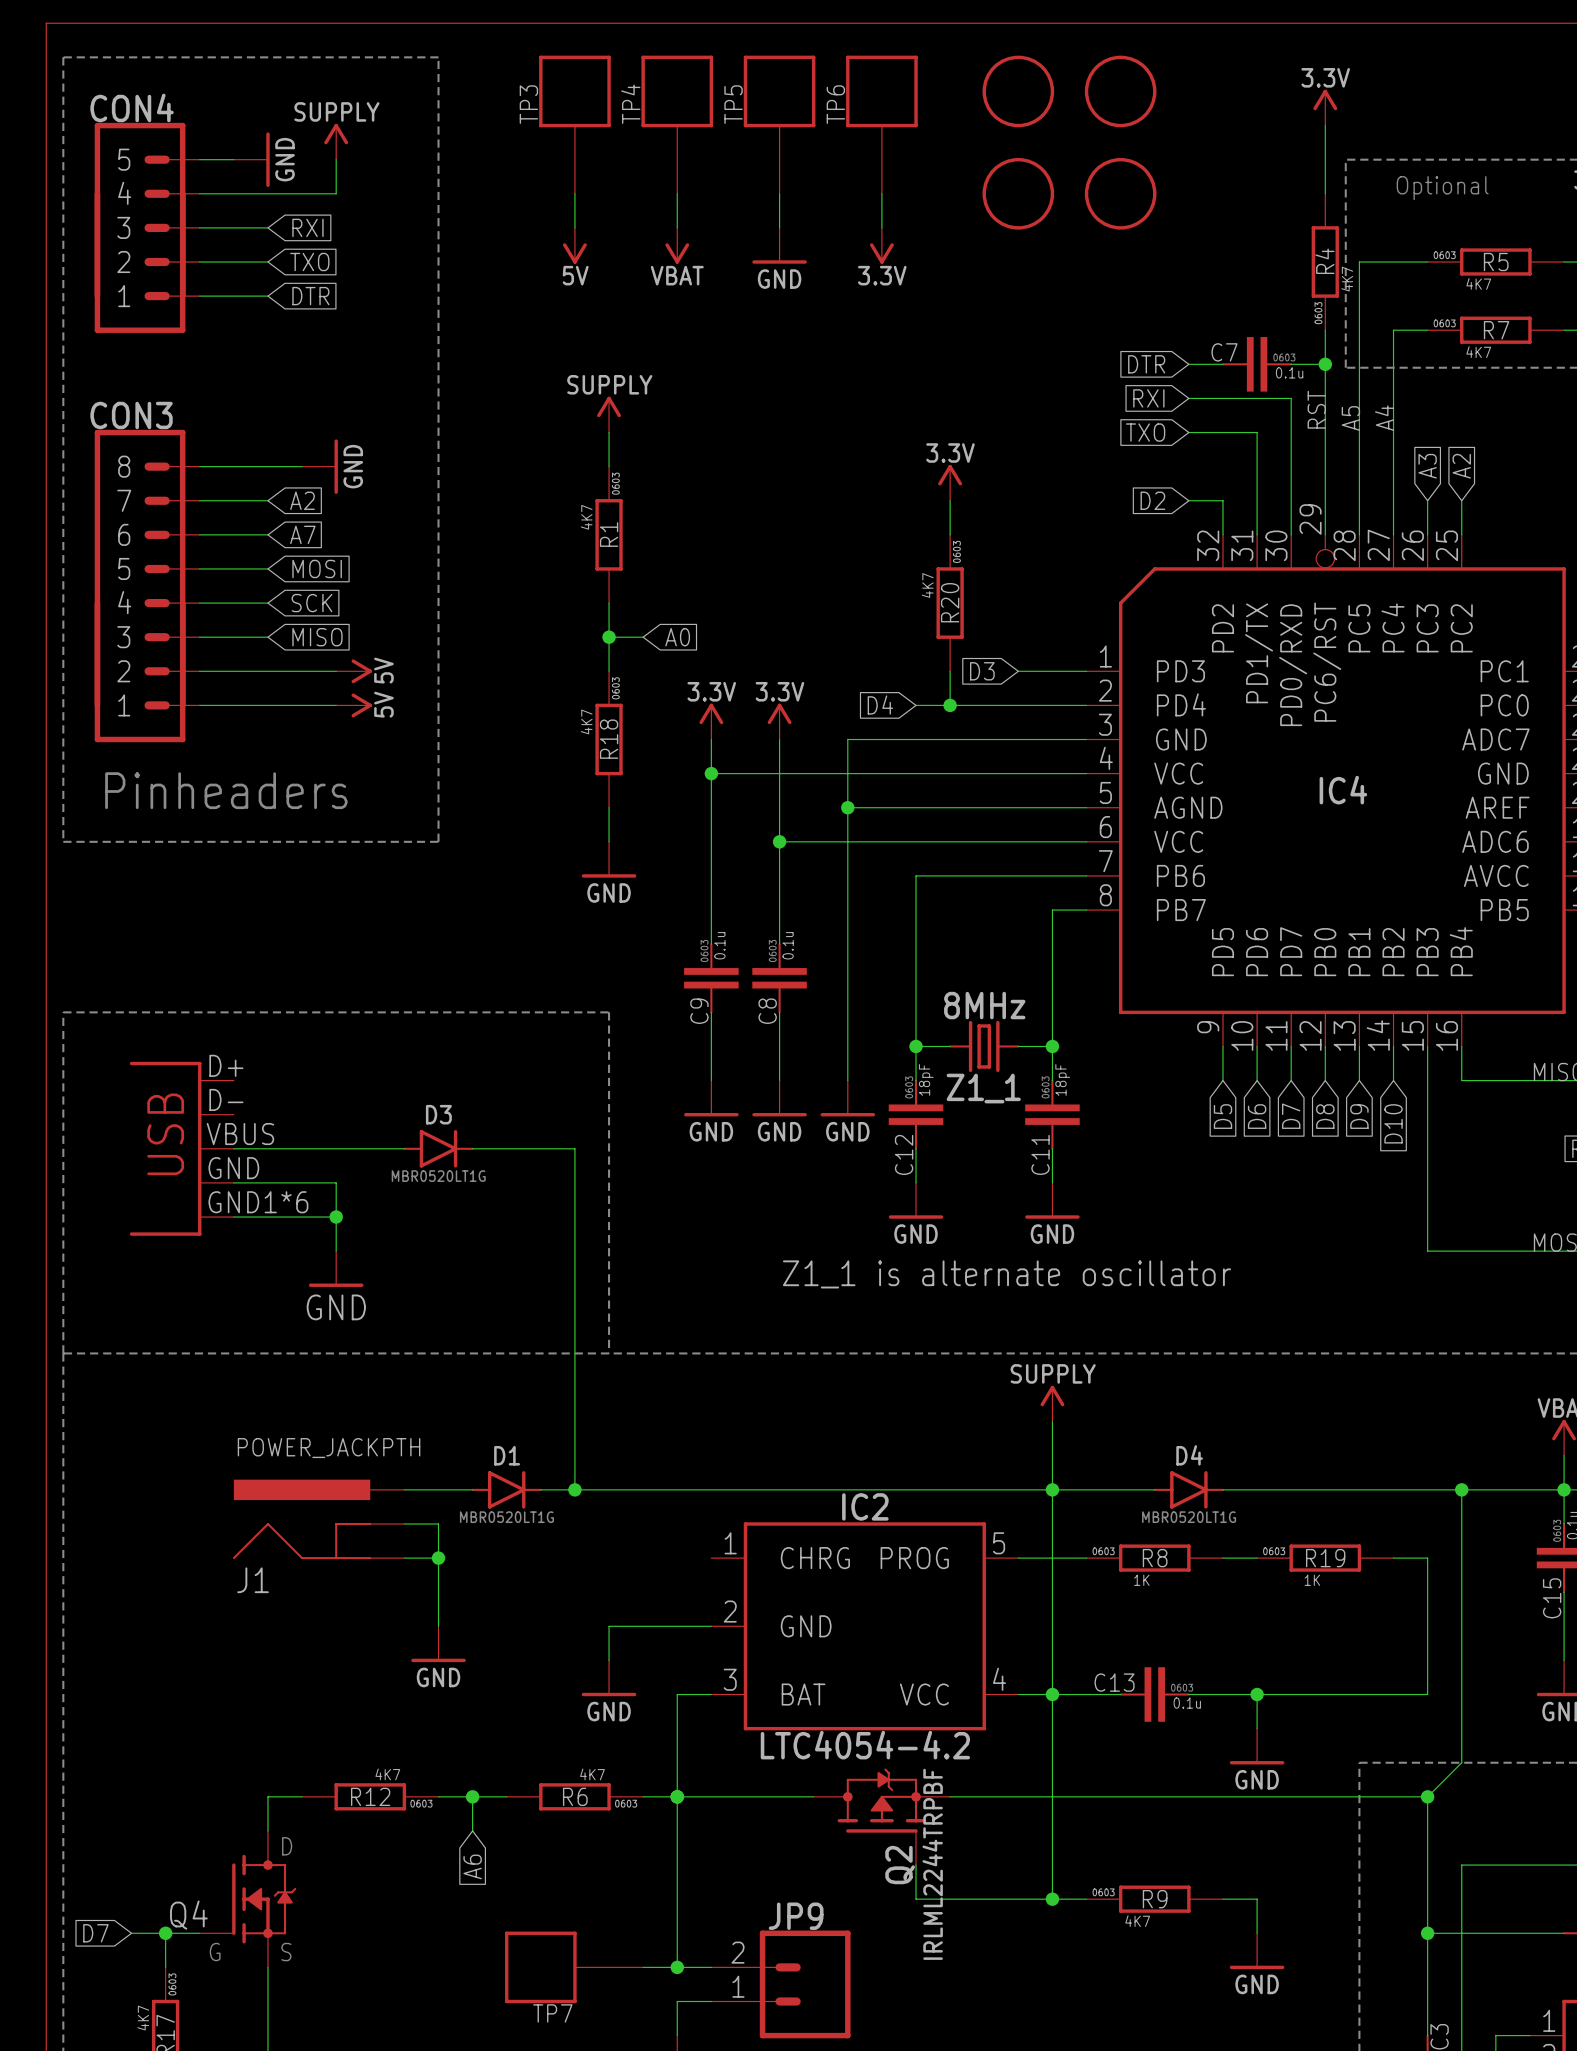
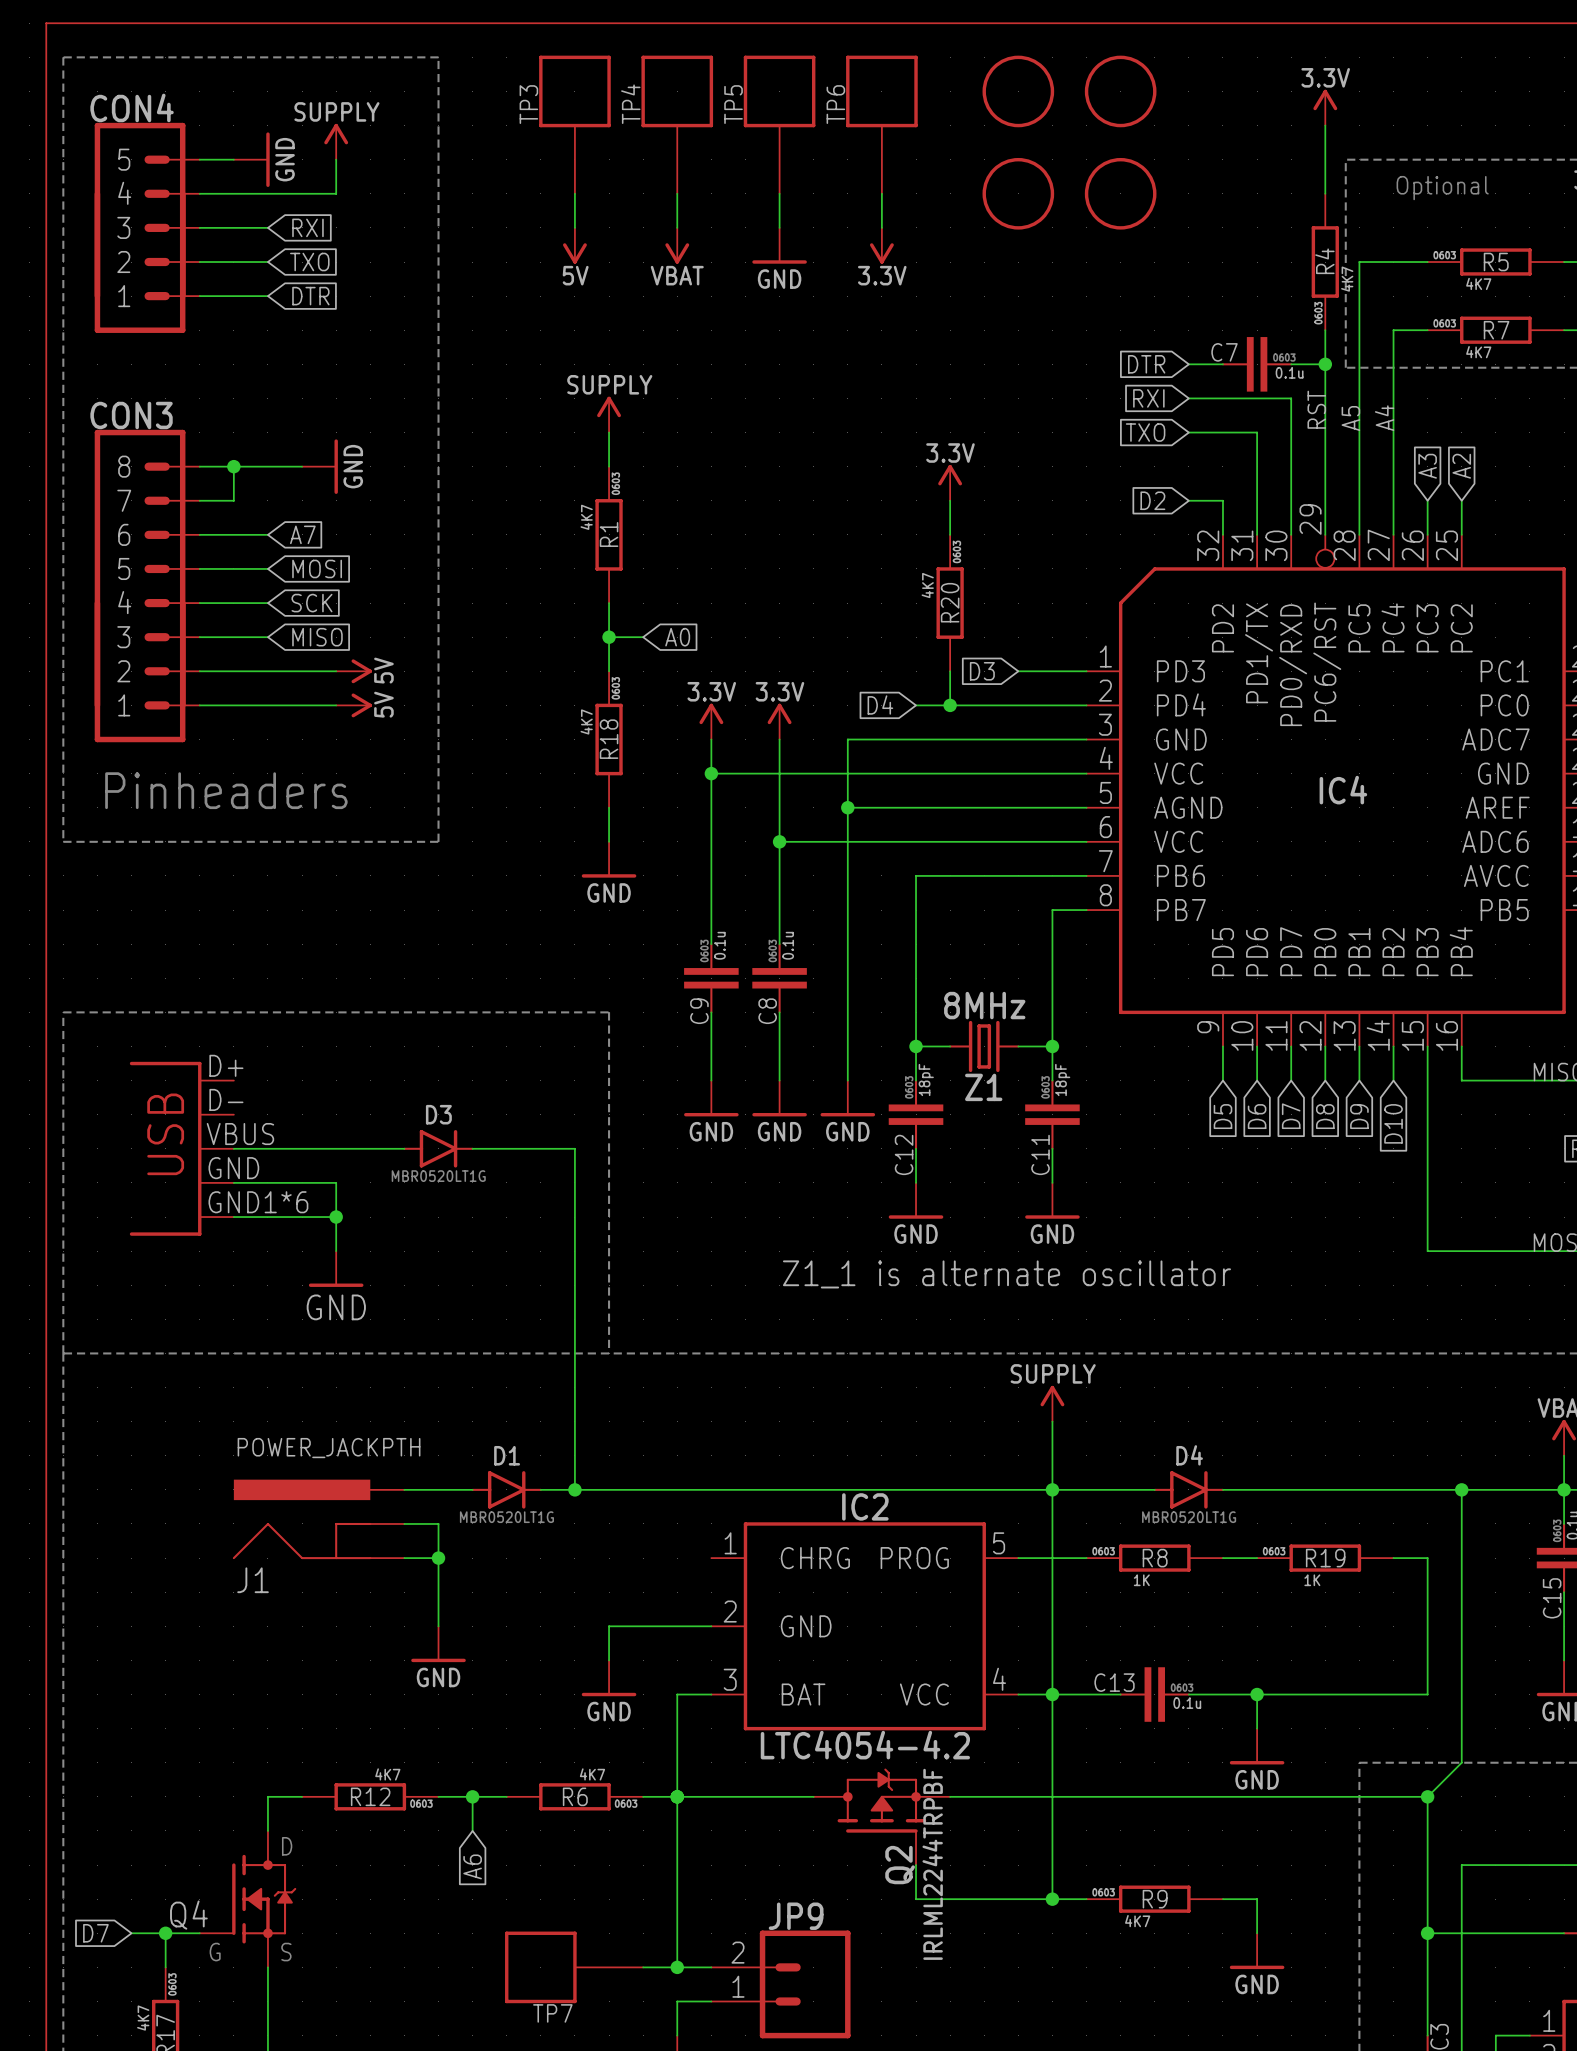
junction: none -> (233, 466)
wire: (233, 500) (267, 500) -> (233, 500) (233, 466)
global label: A2 (302, 500) -> none
Z1_1 name: Z1_1 (983, 1088) -> Z1 (983, 1087)

